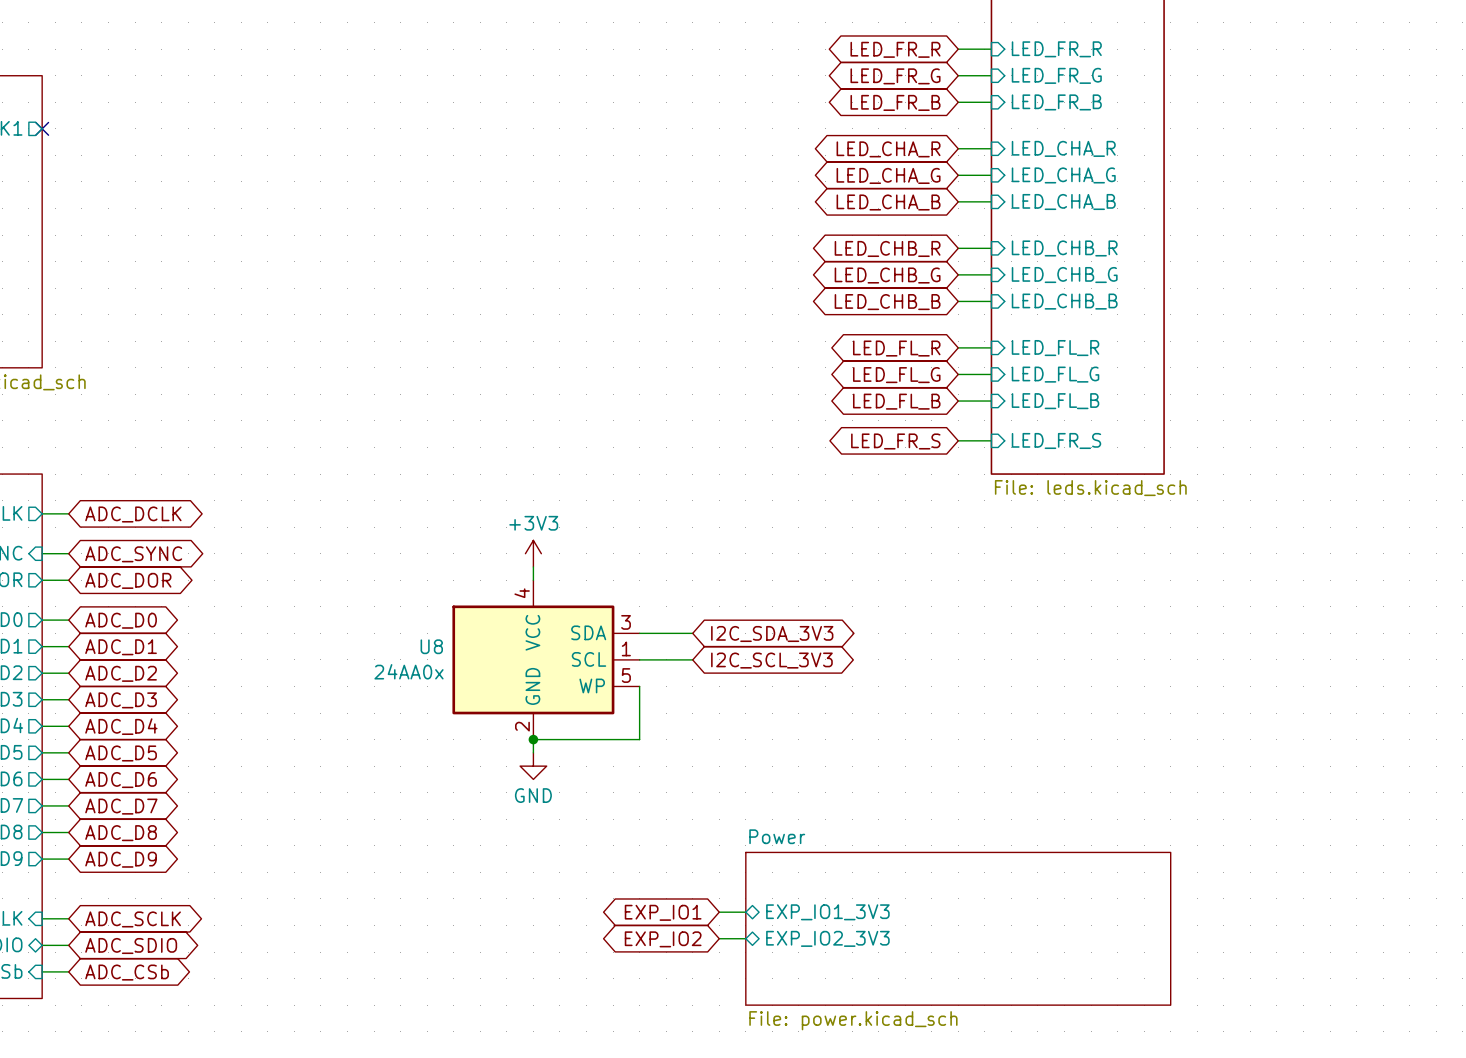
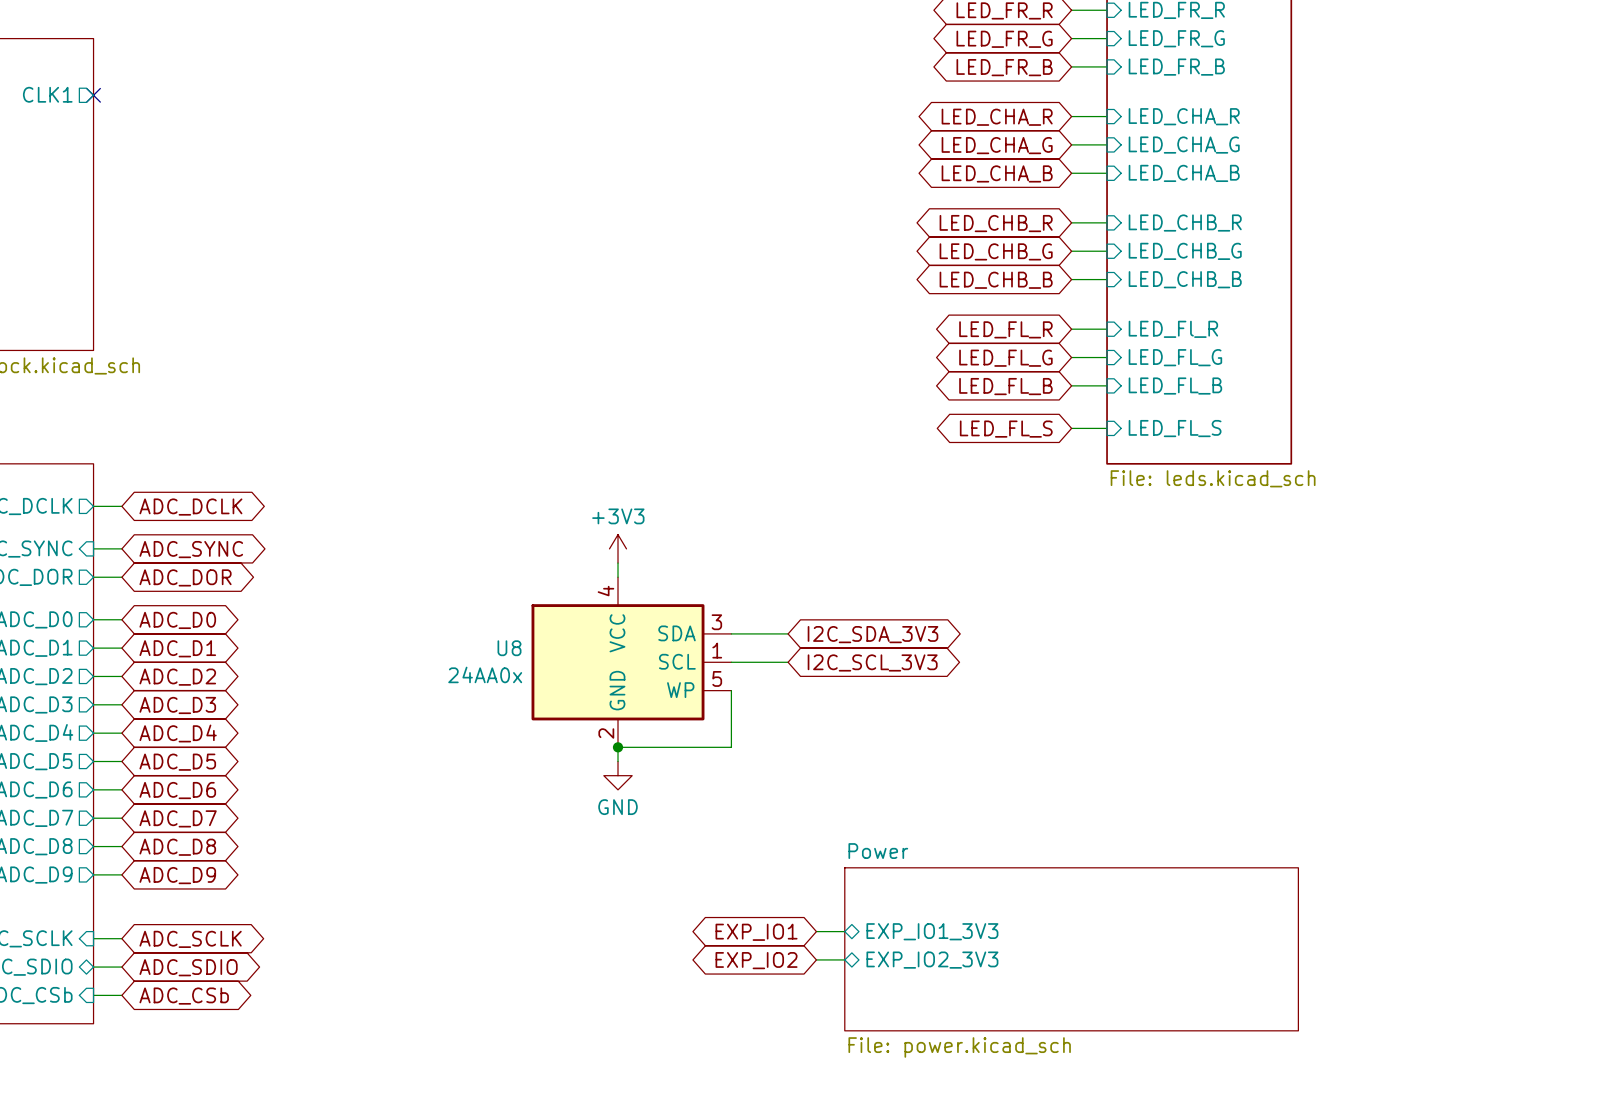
sheet pin: LED_FL_R (1055, 348) -> LED_Fl_R (1173, 329)
sheet pin: LED_FR_S (1056, 440) -> LED_FL_S (1175, 428)
global label: LED_FR_S (895, 441) -> LED_FL_S (1006, 429)

